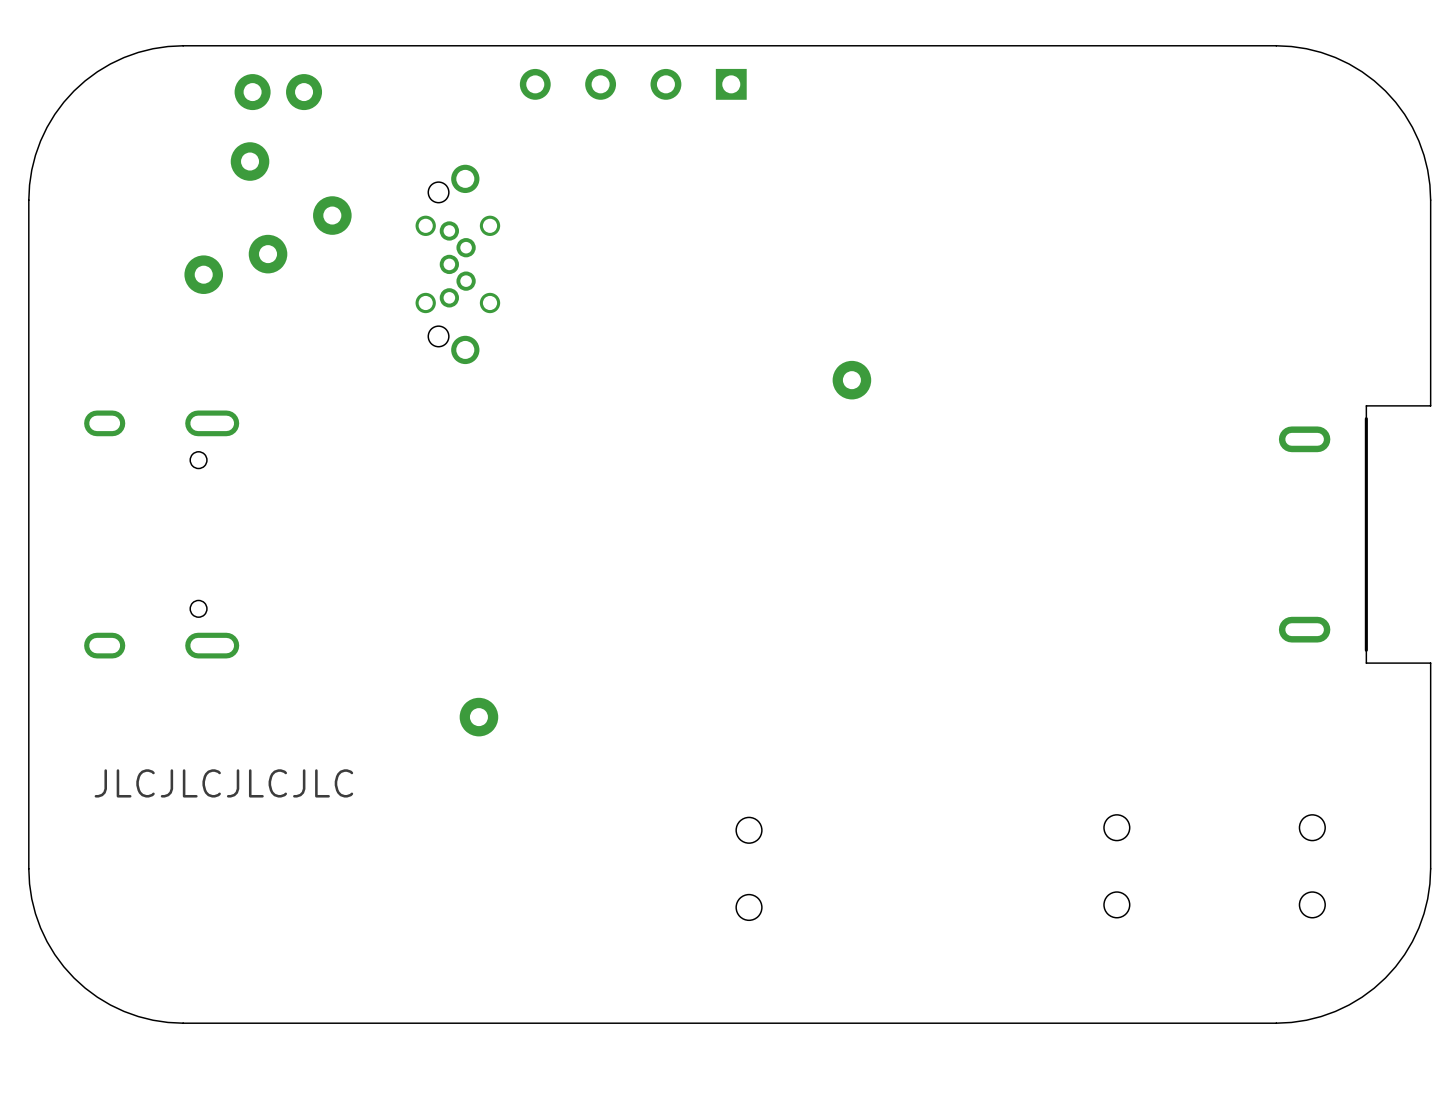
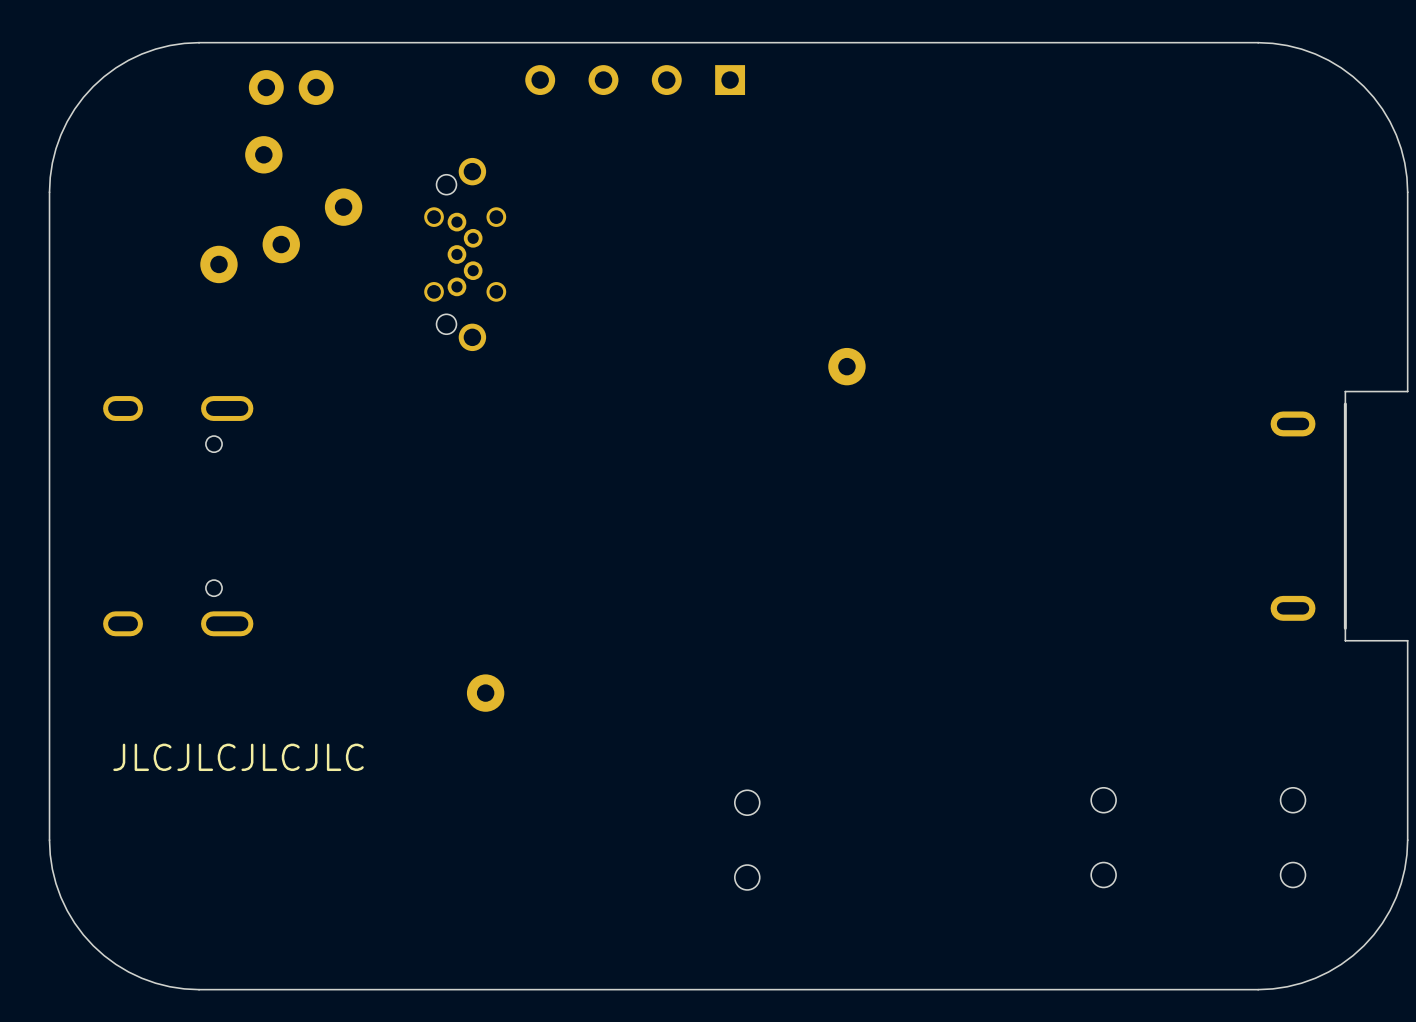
part footprint: [1278, 417, 1368, 652] -> [1270, 402, 1347, 630]

